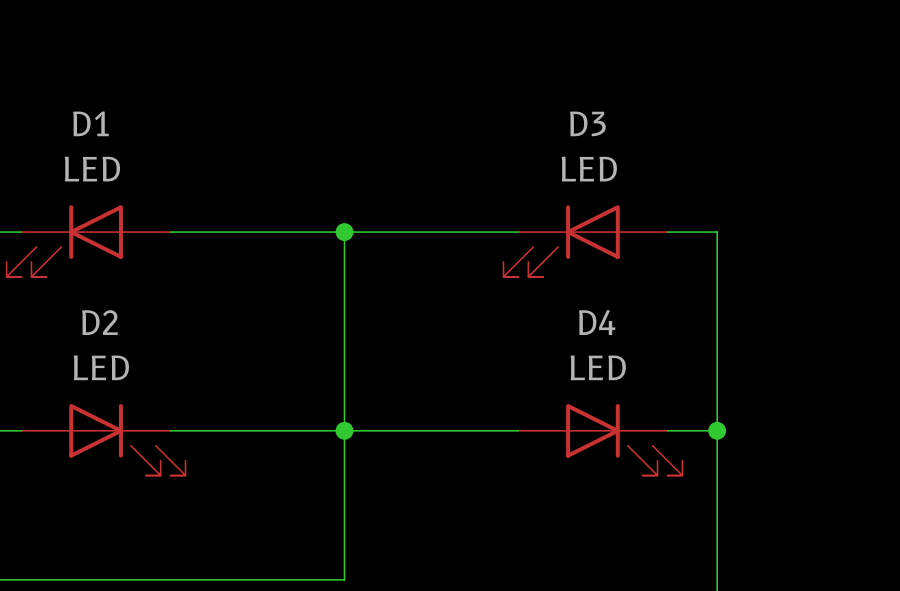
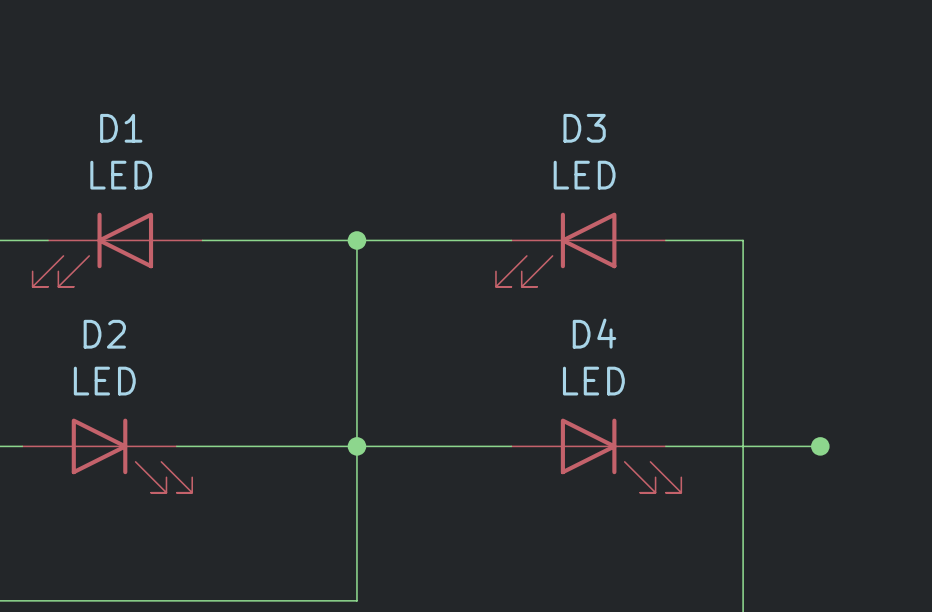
D1 position: (88, 241) -> (117, 249)
D3 position: (585, 241) -> (580, 249)
wire: none -> (743, 446) (820, 446)
junction position: (717, 430) -> (820, 446)
D4 position: (600, 439) -> (596, 455)

